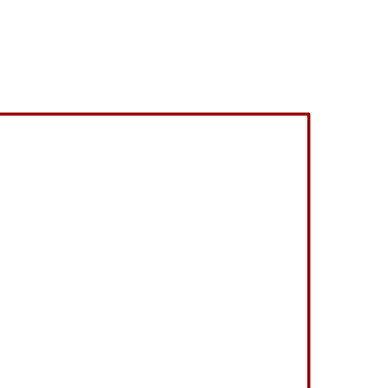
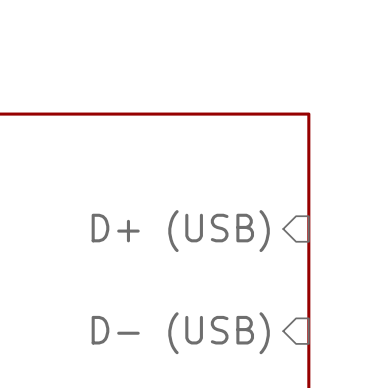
sheet pin: none -> D+ (USB) (180, 231)
sheet pin: none -> D- (USB) (180, 333)

